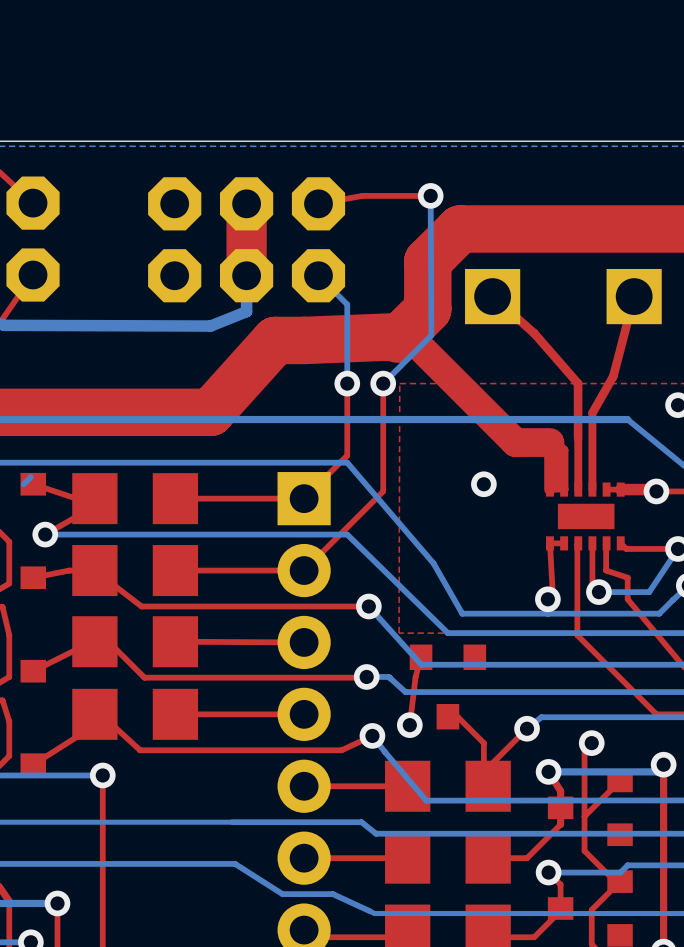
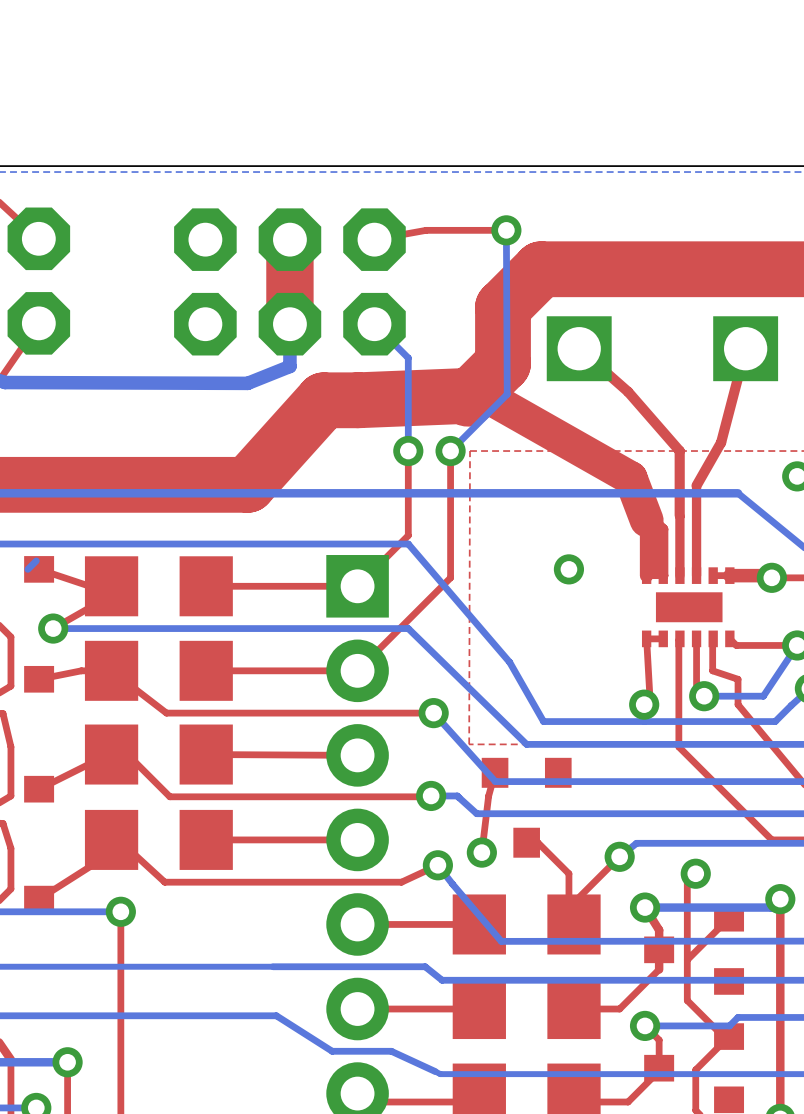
top track: (405, 332) (515, 442) (550, 442) -> (476, 390) (630, 478) (646, 520)

